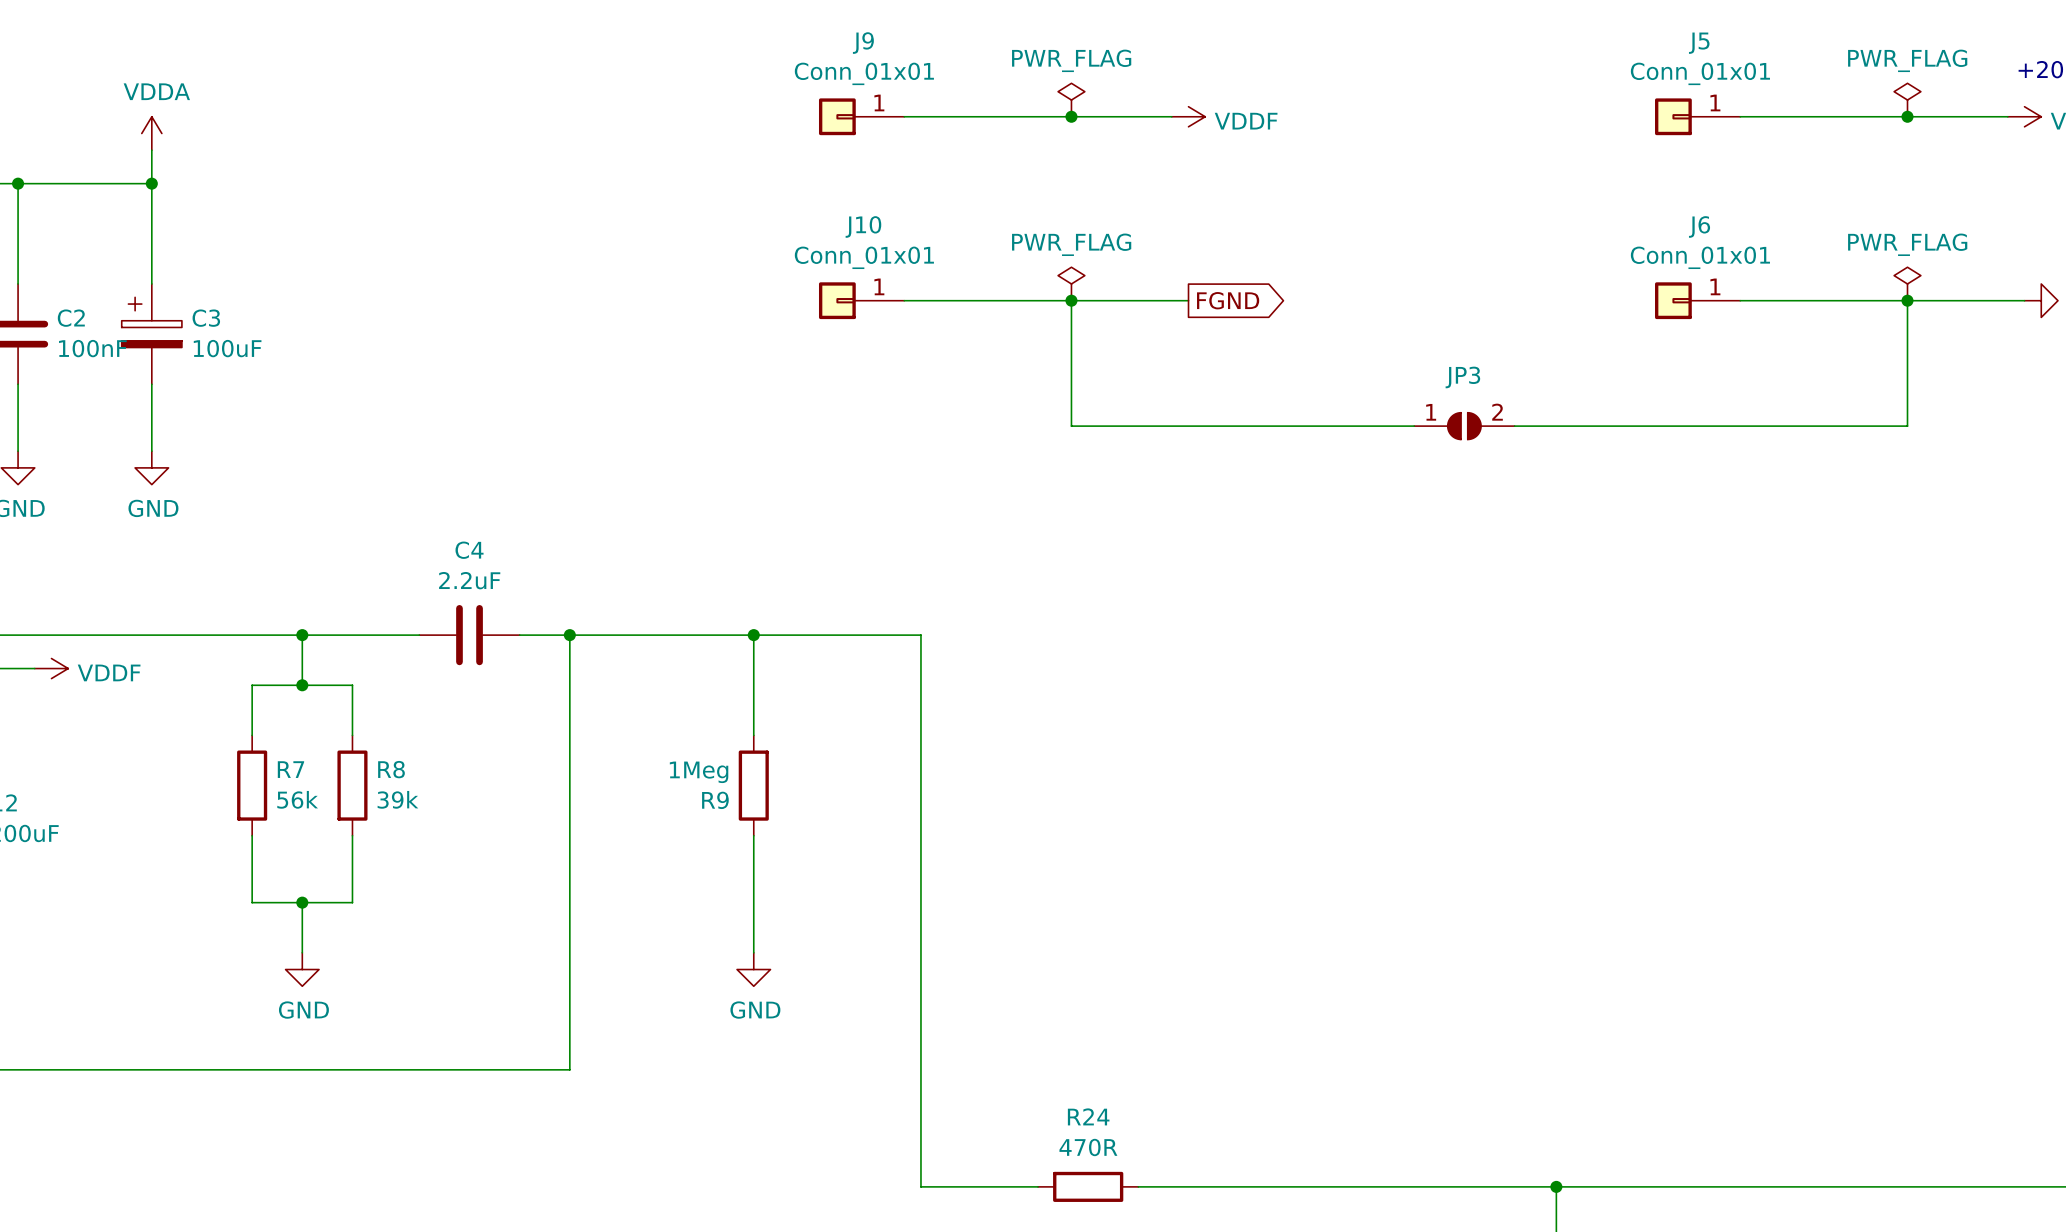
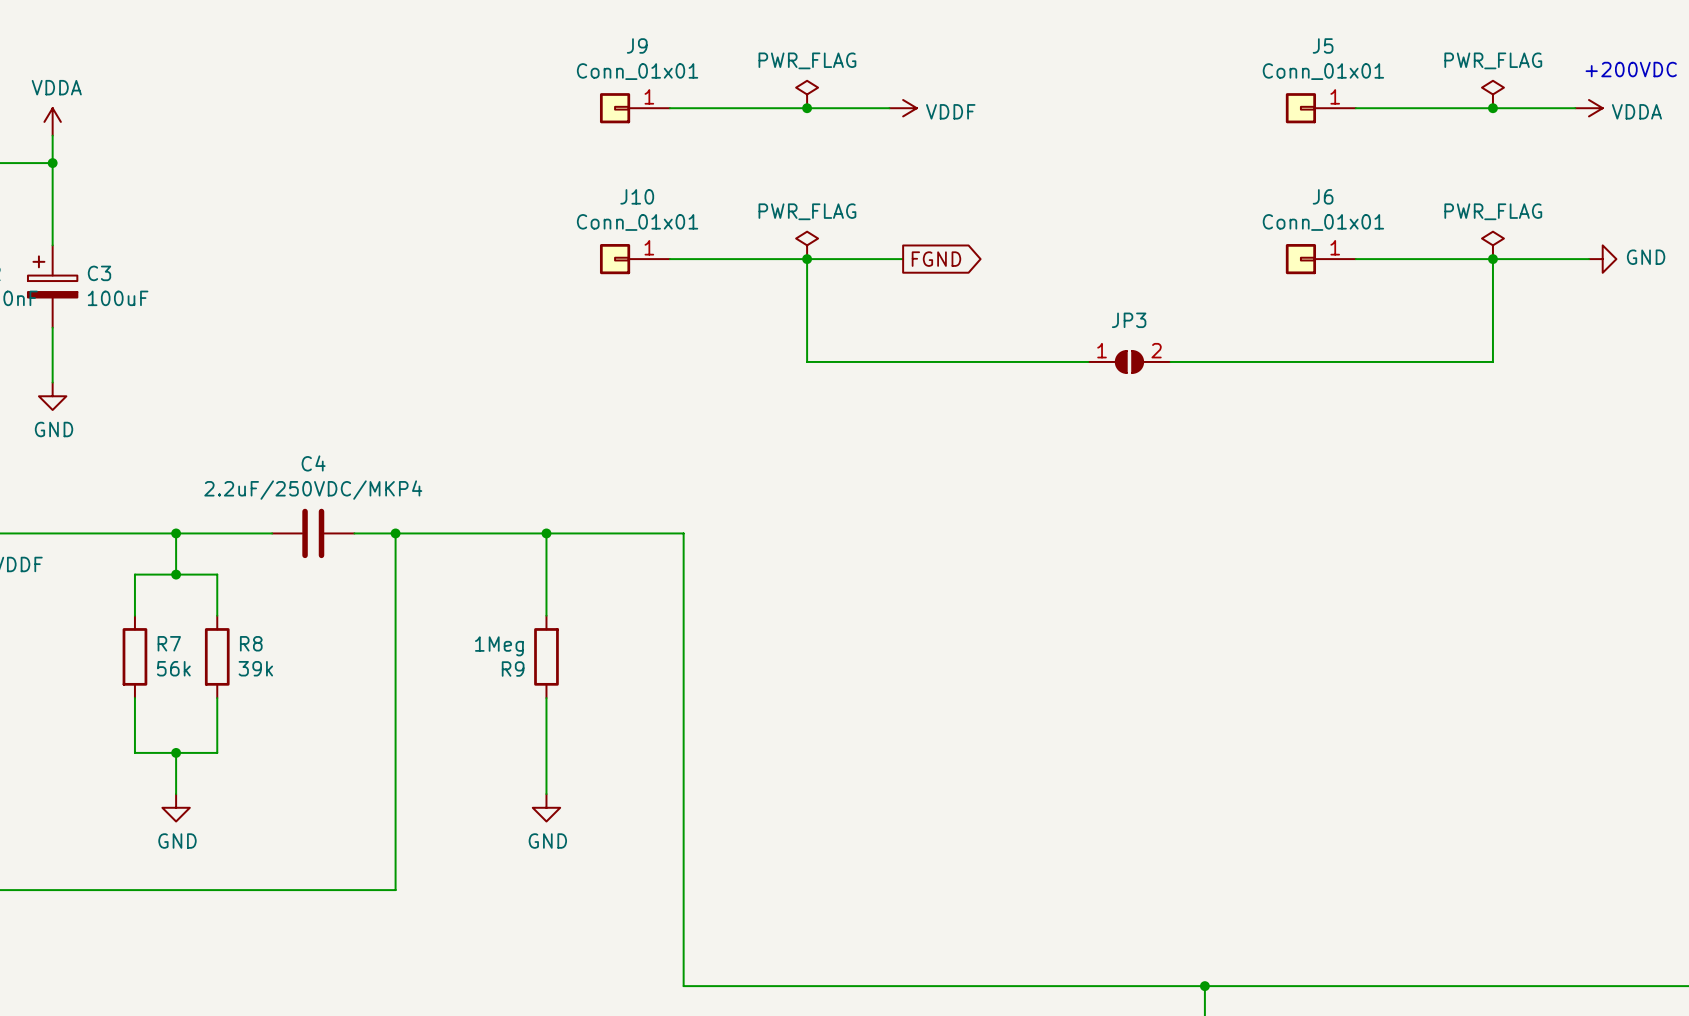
C4 value: 2.2uF (469, 580) -> 2.2uF/250VDC/MKP4 (313, 490)
wire: none -> (779, 986) (861, 986)
R24: 470R (1088, 1186) -> none

